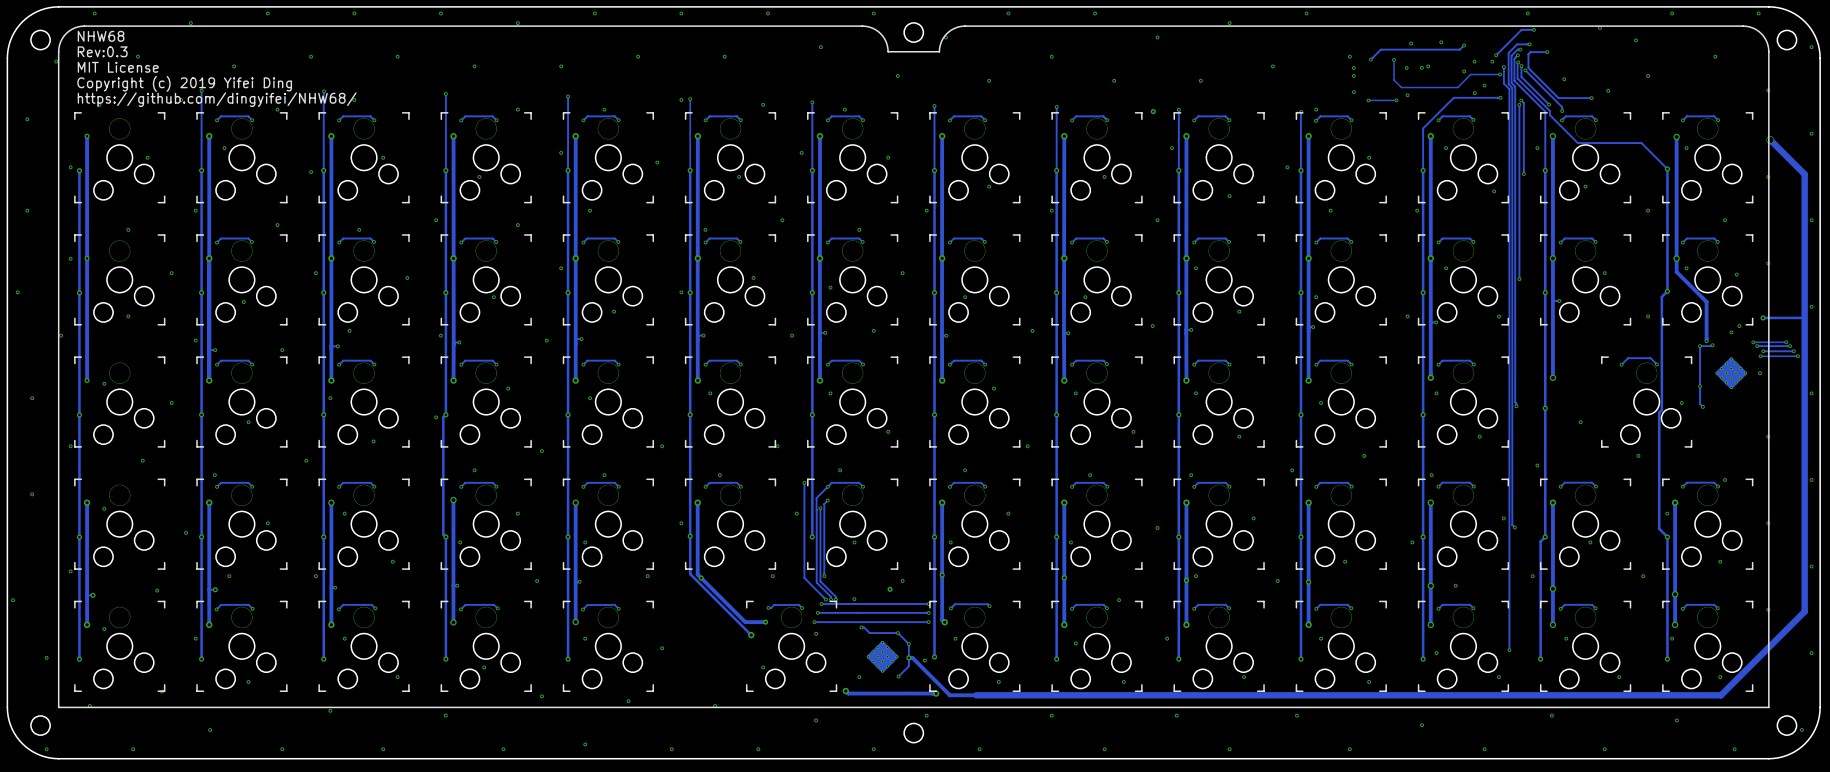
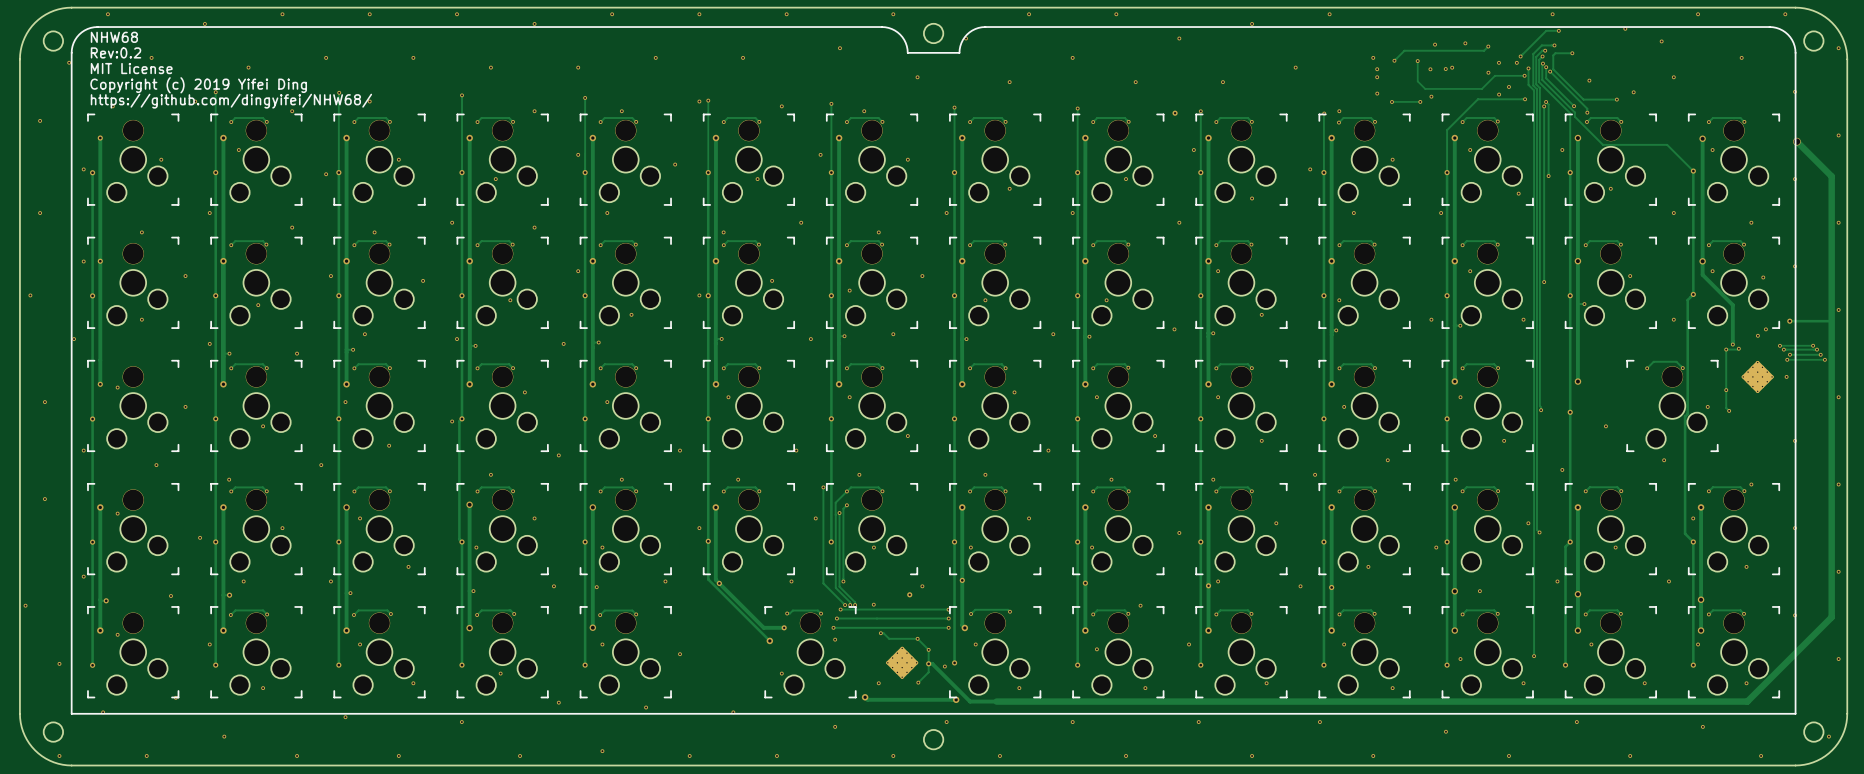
text: Rev:0.3 (102, 51) -> Rev:0.2 (116, 52)

